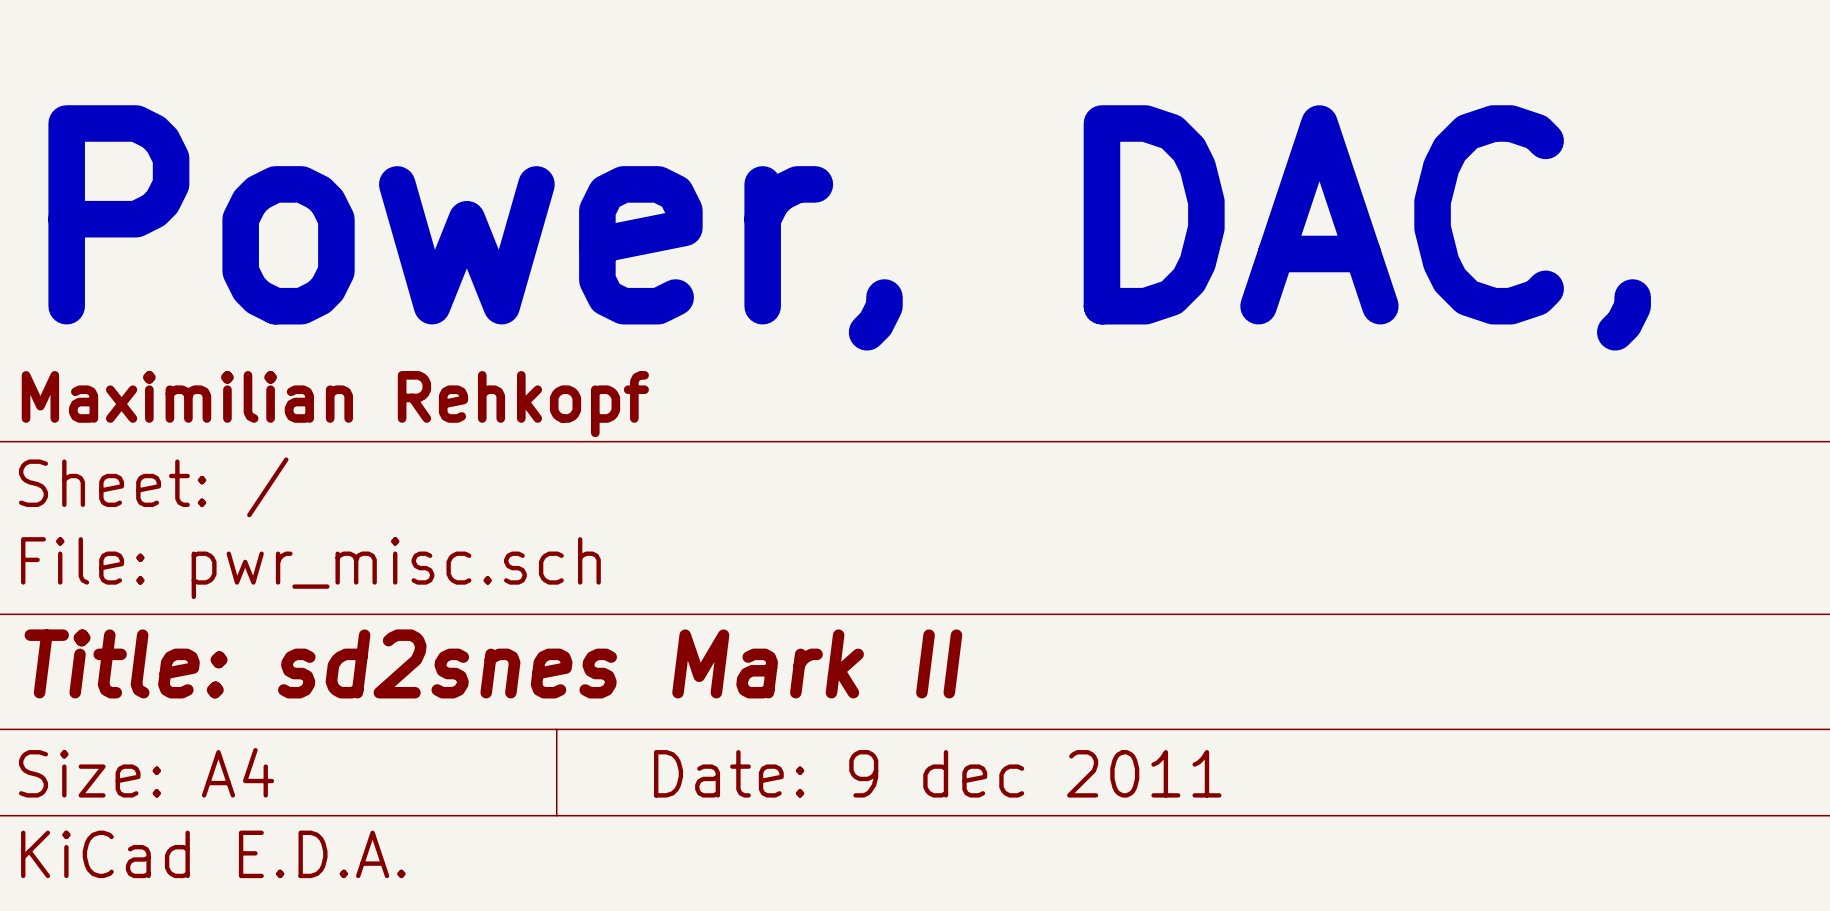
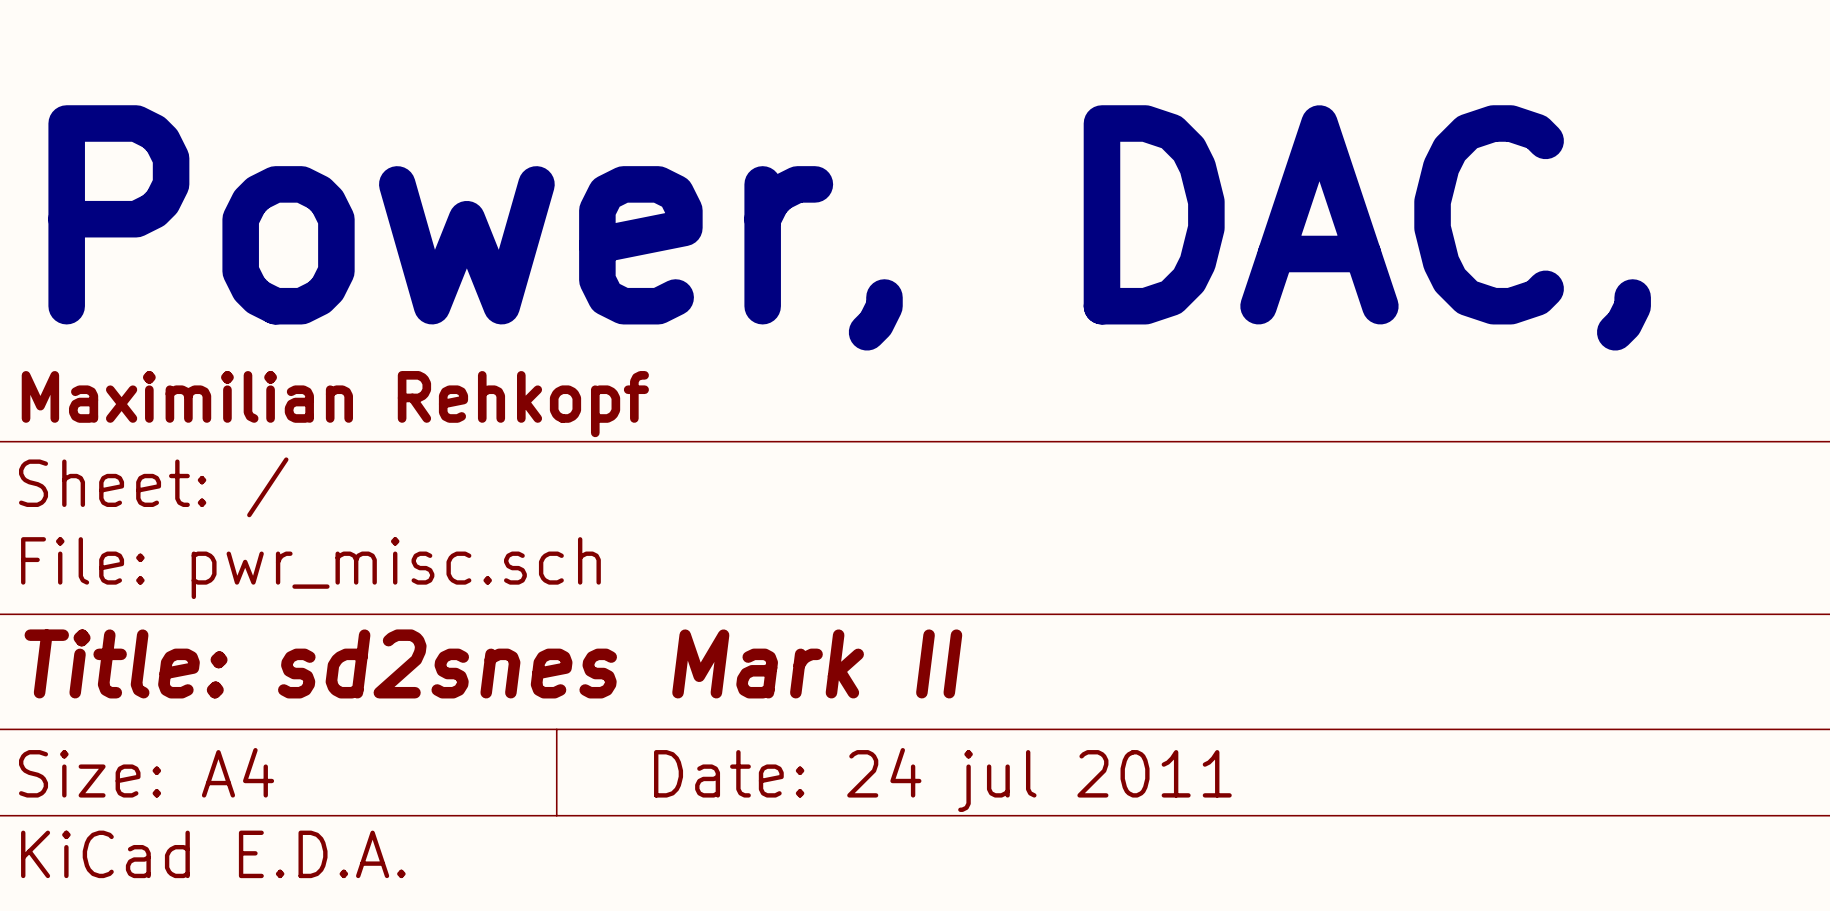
title block: Date: 9 dec 2011 (937, 773) -> Date: 24 jul 2011 (942, 779)

